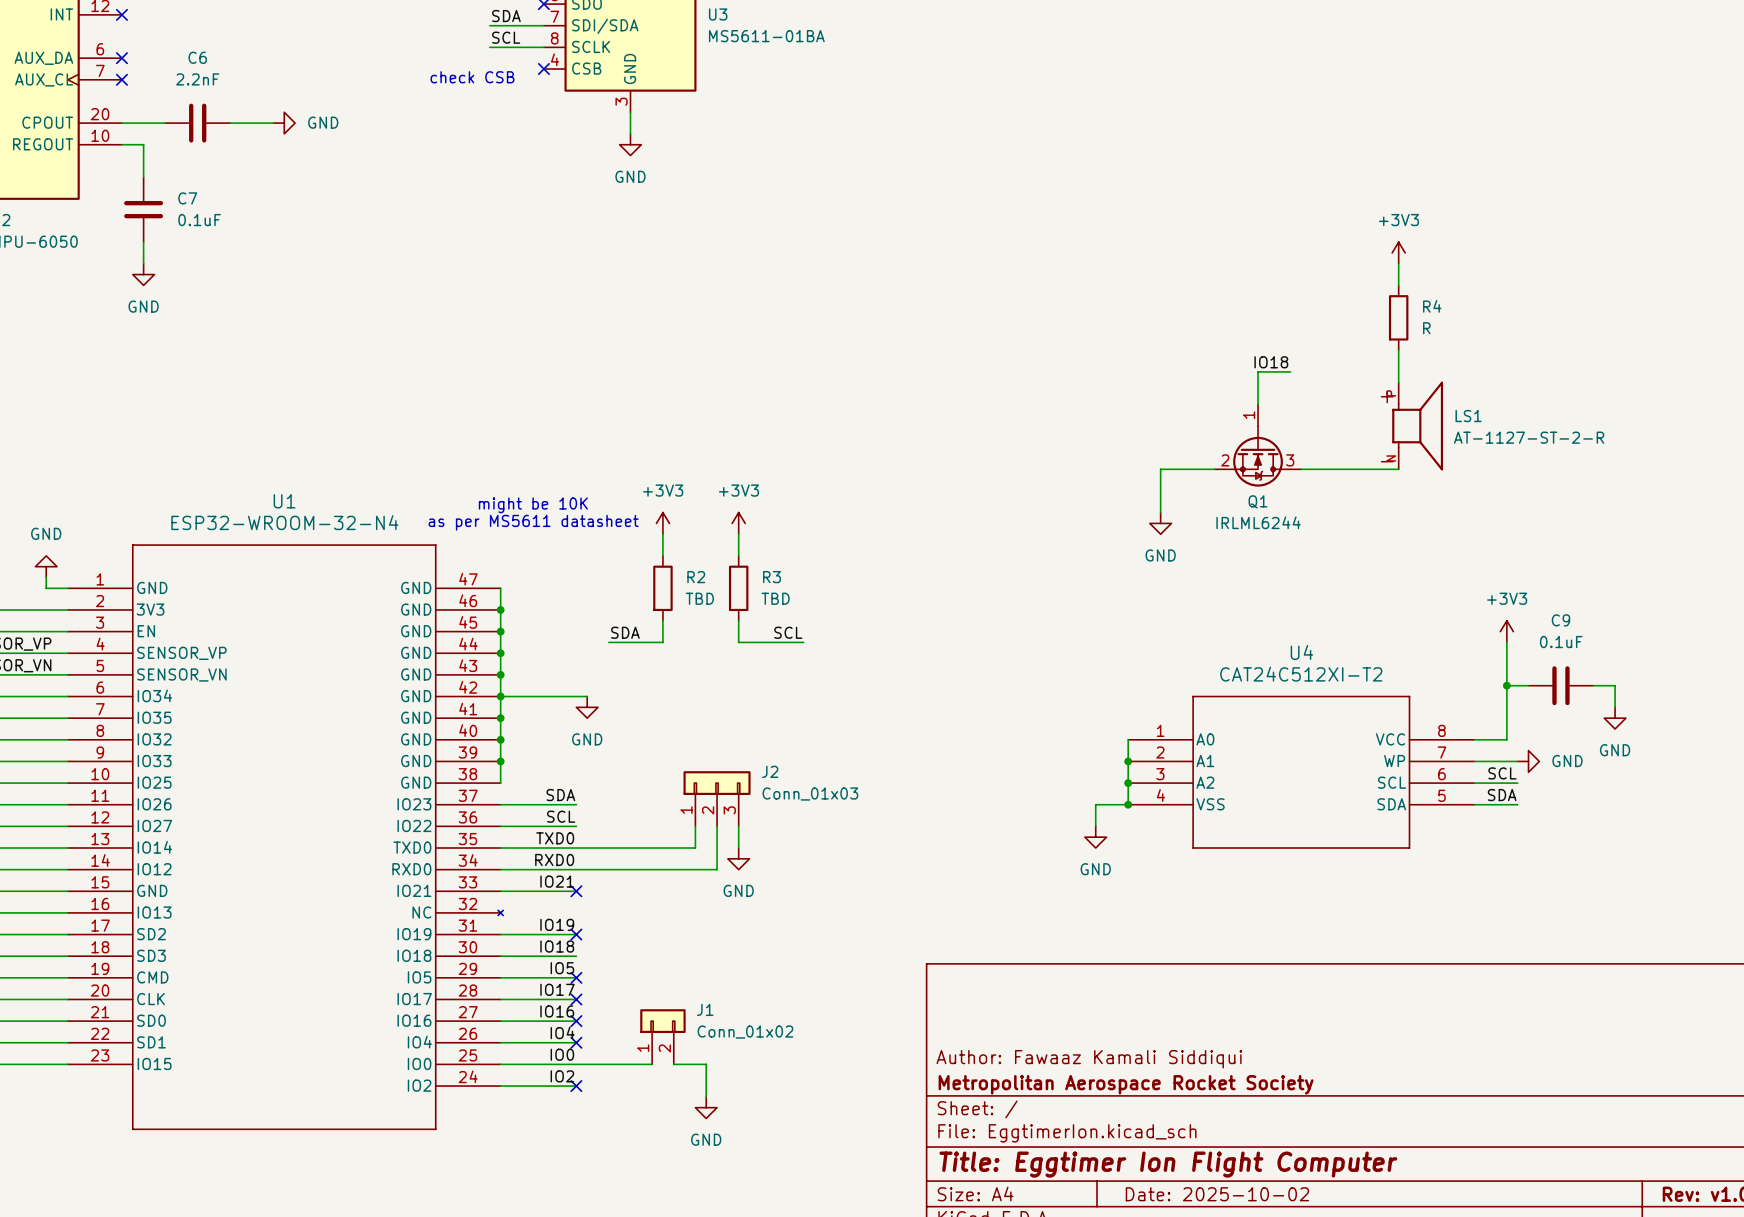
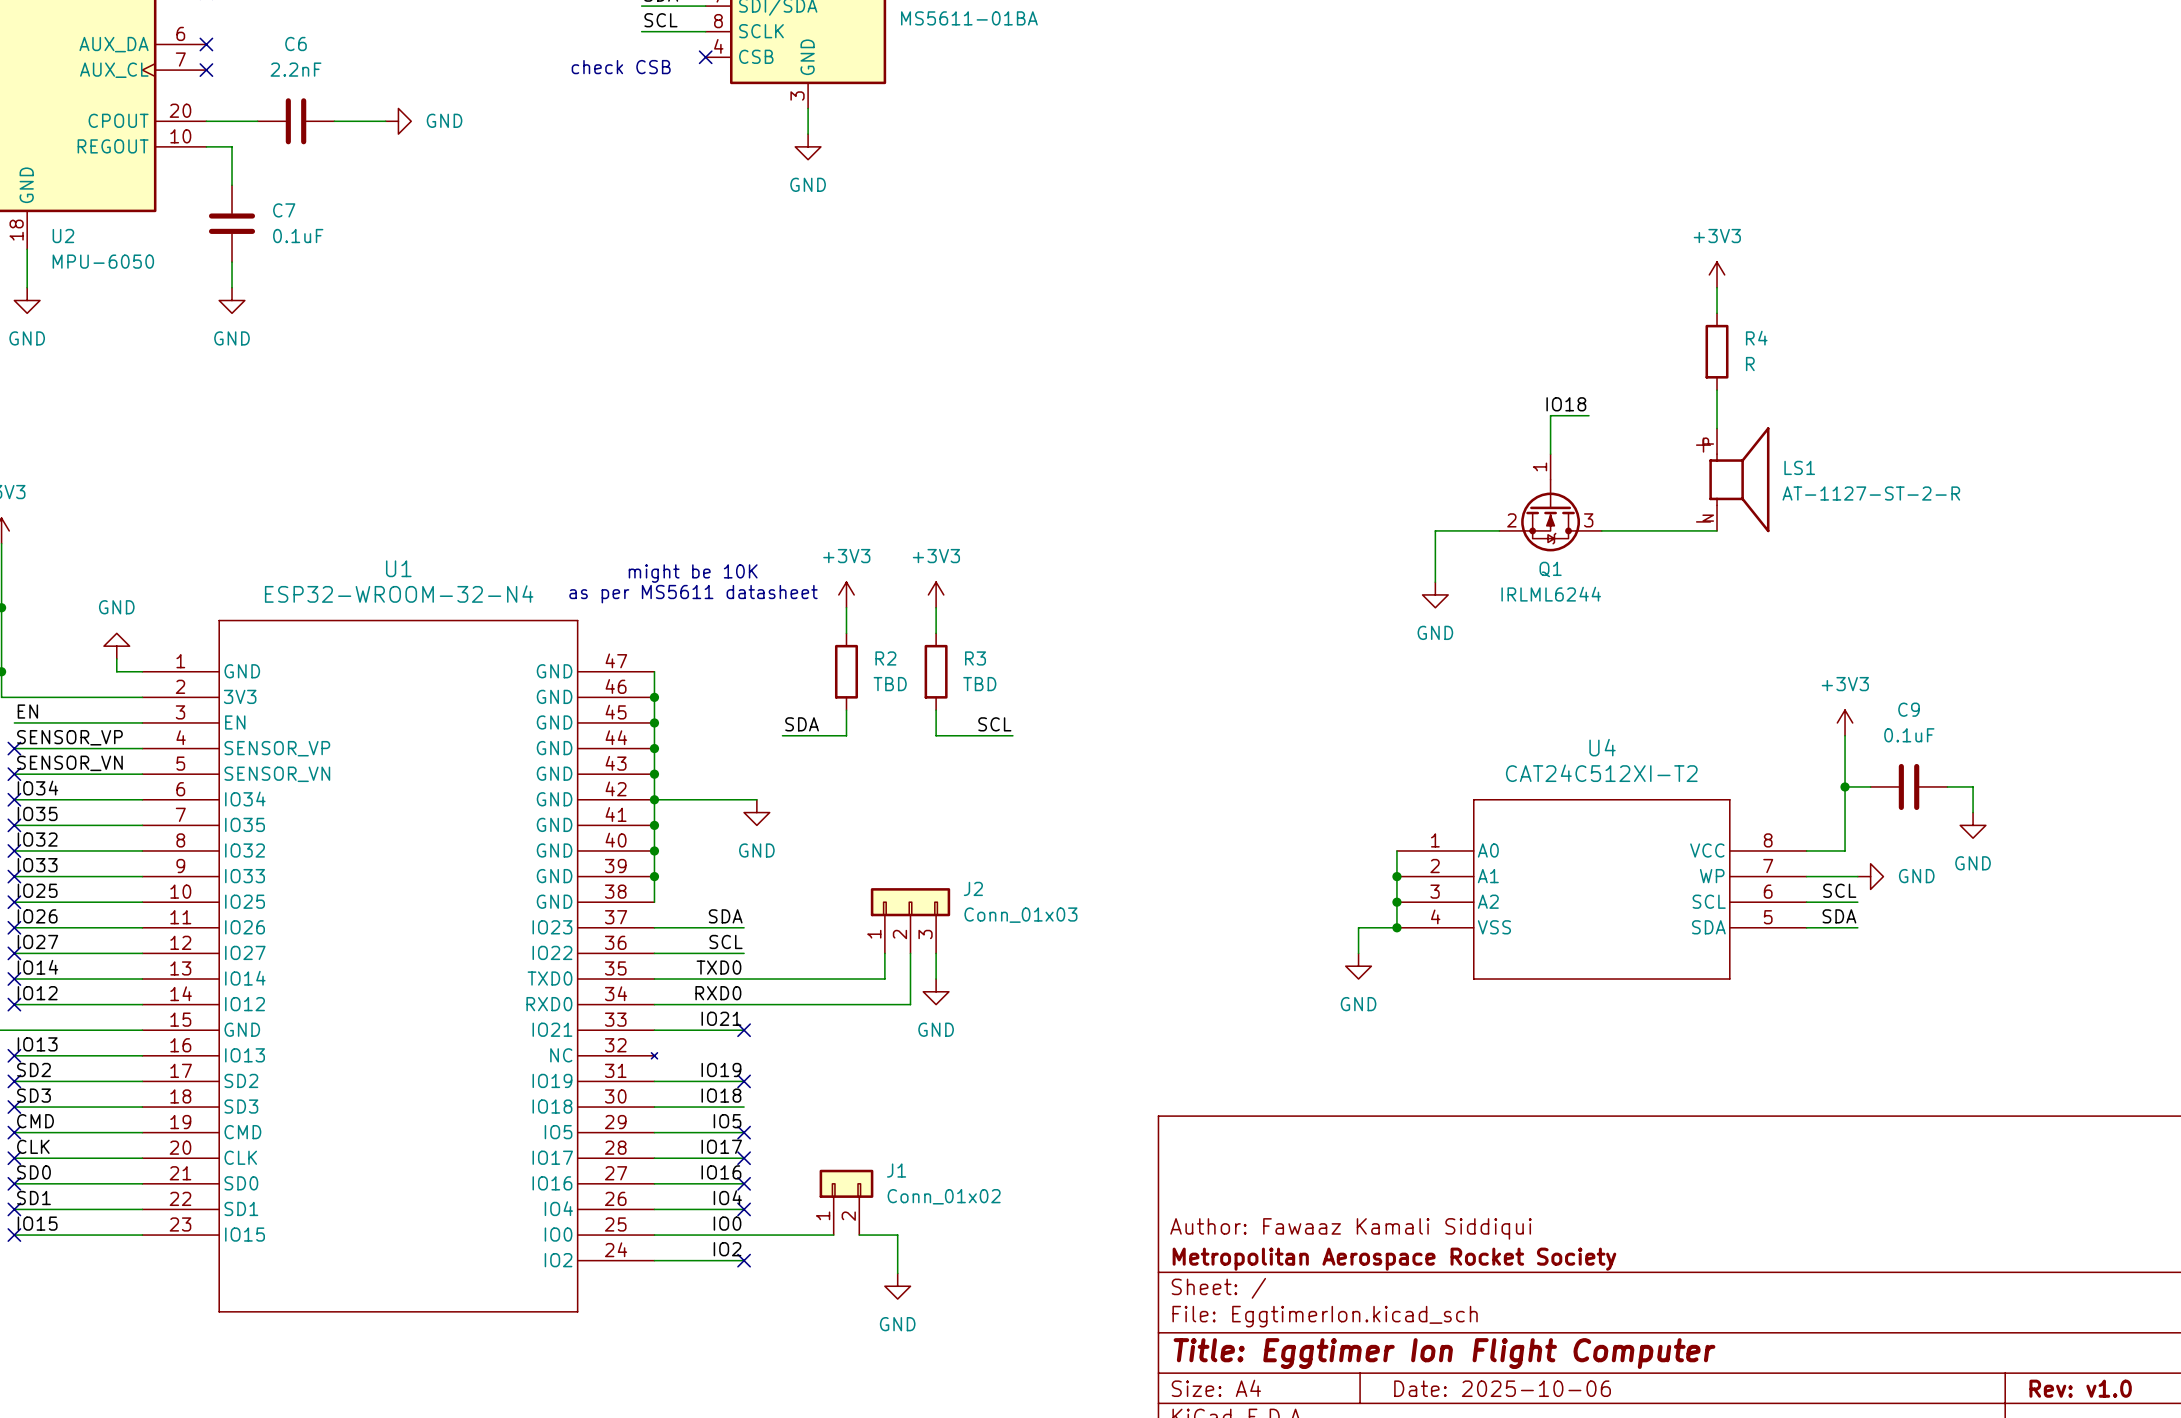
title block: Date: 2025-10-02 (1217, 1194) -> Date: 2025-10-06 (1502, 1388)

